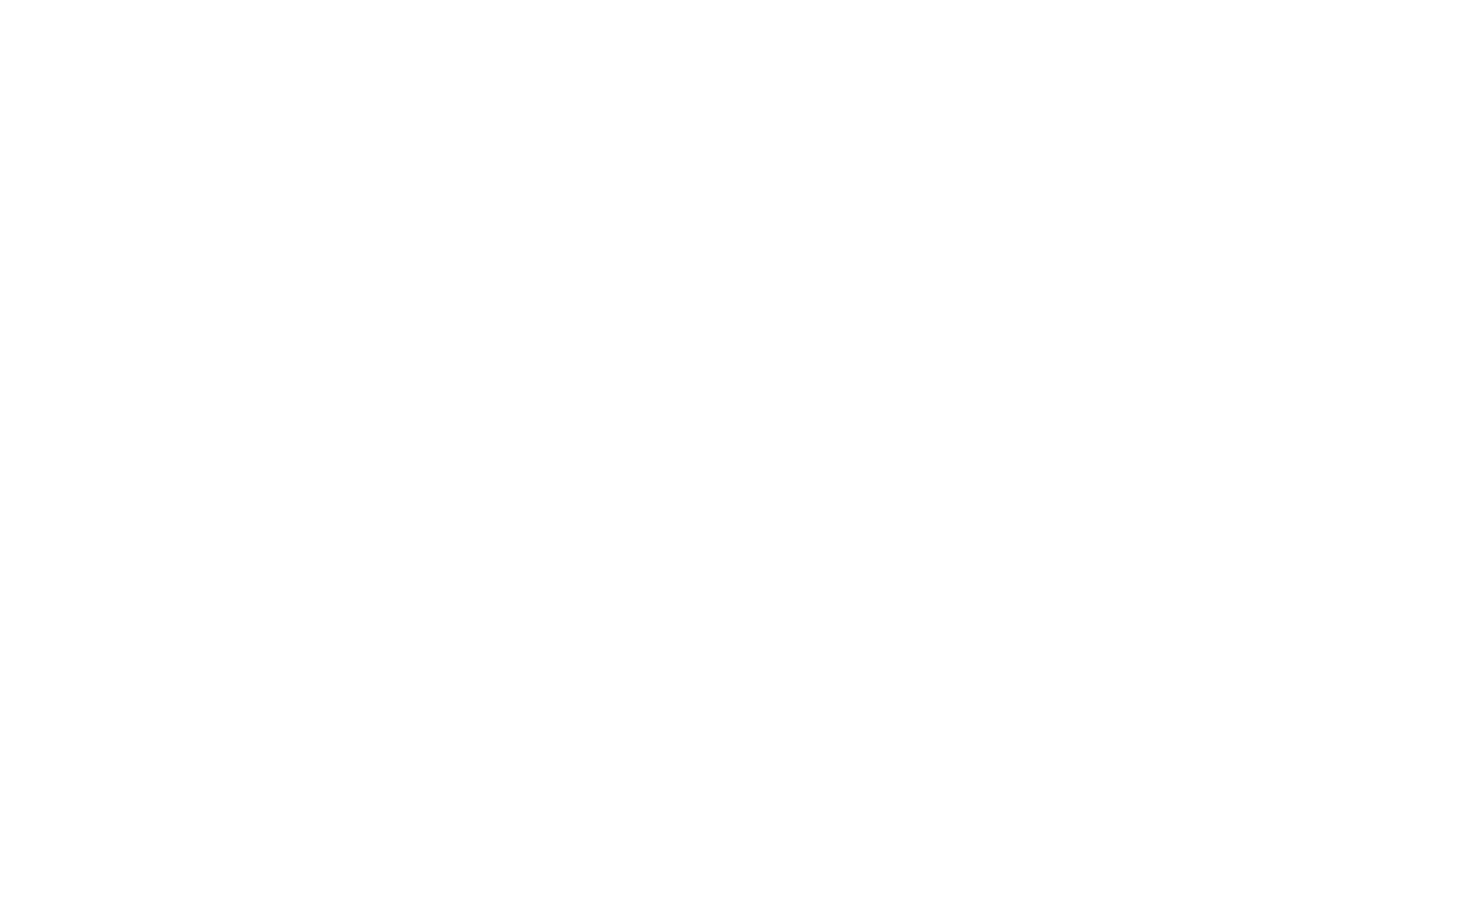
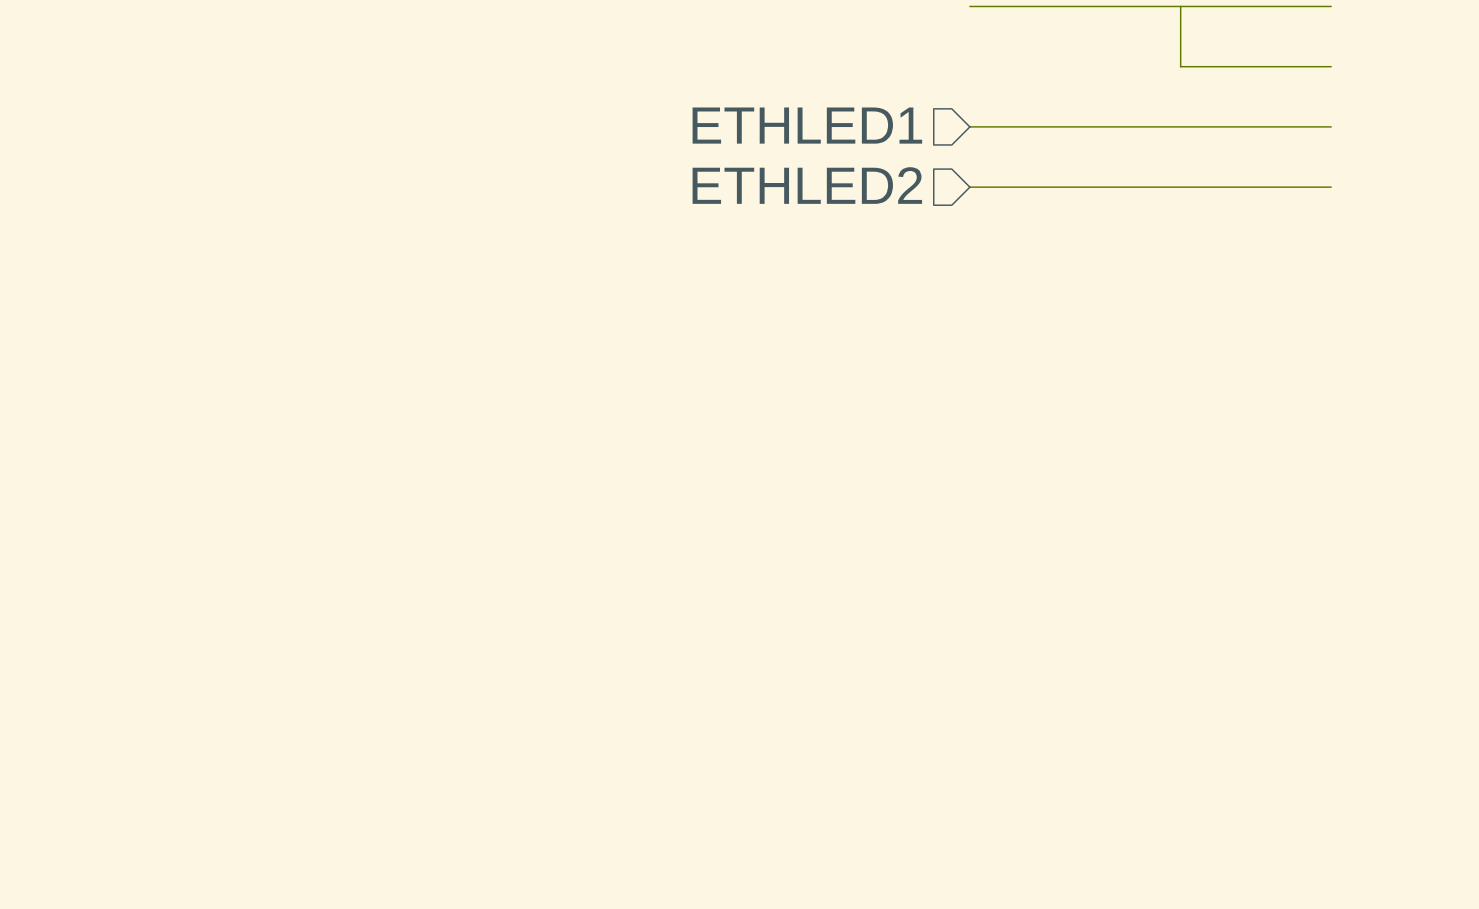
wire: none -> (969, 6) (1331, 6)
wire: none -> (1180, 6) (1180, 66) (1331, 66)
sheet pin: none -> ETHLED1 (807, 125)
wire: none -> (969, 126) (1331, 126)
sheet pin: none -> ETHLED2 (807, 185)
wire: none -> (969, 187) (1331, 187)

